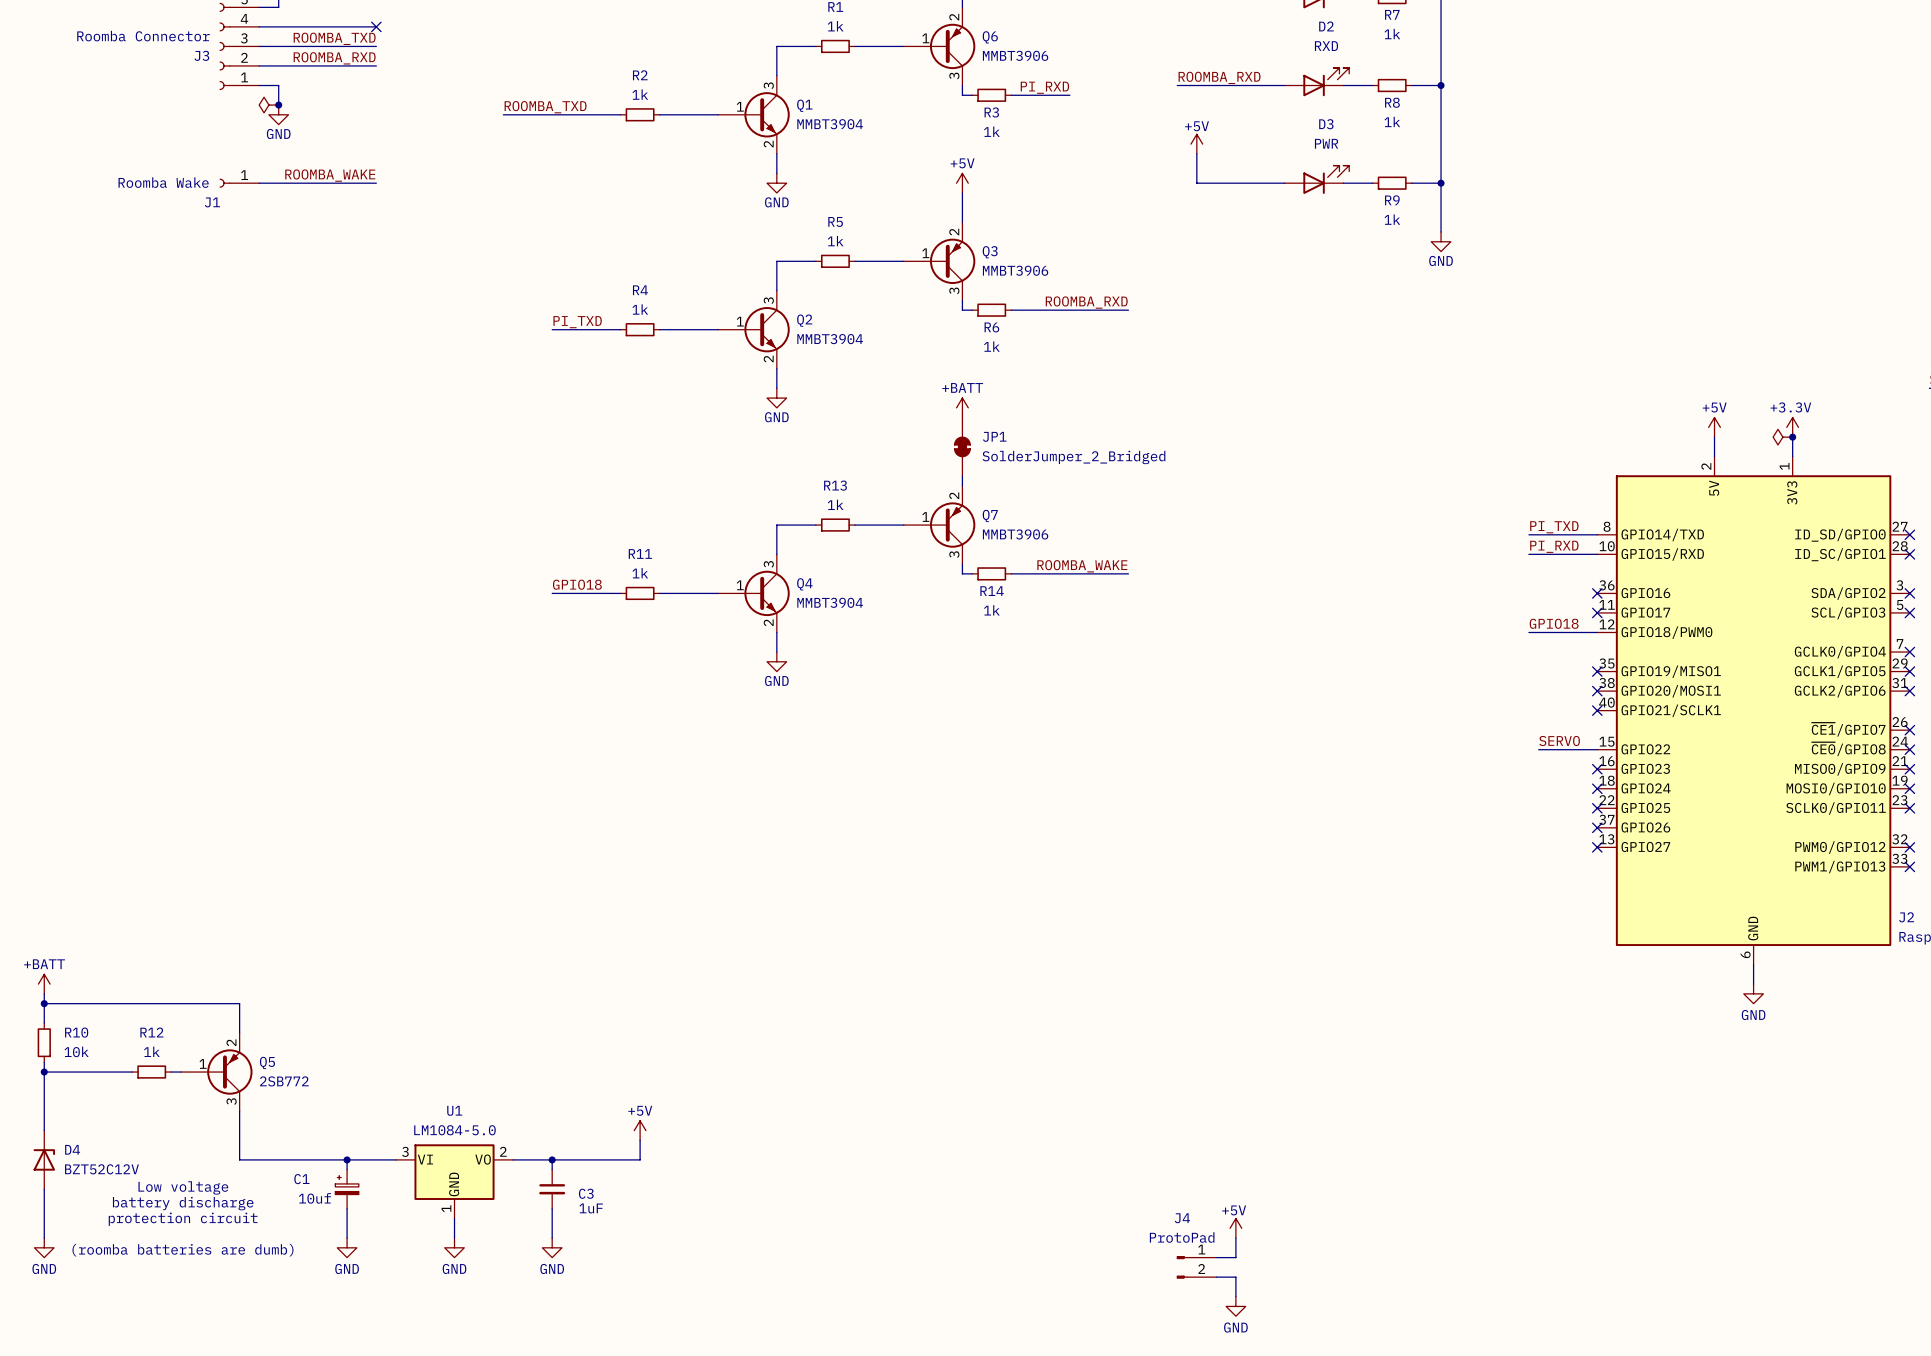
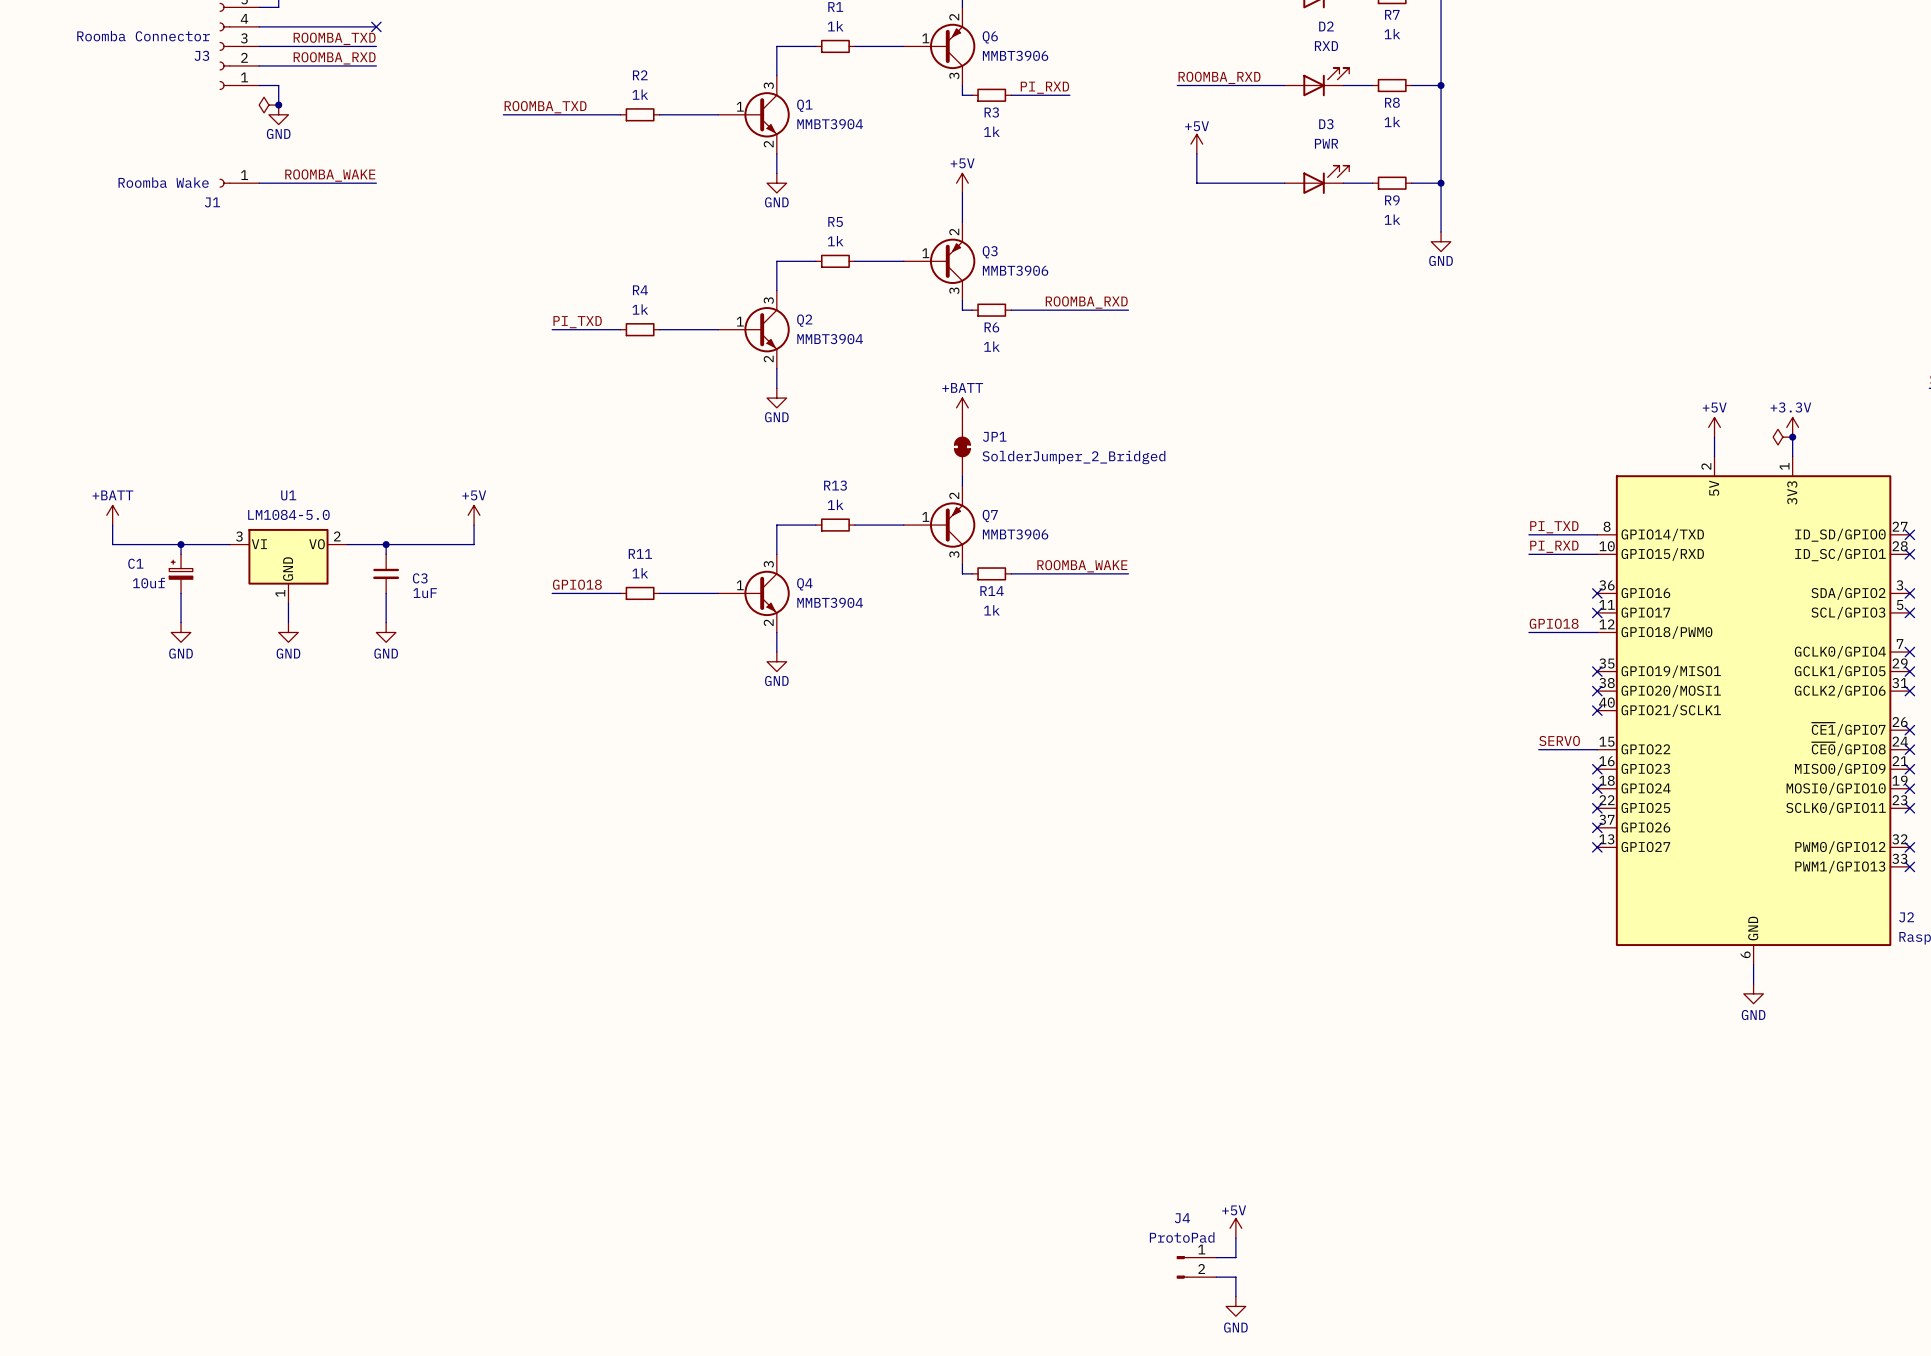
power symbol: none -> +BATT (112, 515)
power symbol: none -> +5V (474, 515)
wire: none -> (112, 525) (112, 544) (229, 544)
wire: none -> (474, 525) (474, 544) (347, 544)
wire: none -> (181, 544) (181, 554)
junction: none -> (181, 544)
wire: none -> (386, 544) (386, 554)
junction: none -> (386, 544)
wire: none -> (181, 593) (181, 622)
wire: none -> (386, 593) (386, 622)
wire: none -> (288, 603) (288, 622)
power symbol: none -> GND (181, 632)
power symbol: none -> GND (288, 632)
power symbol: none -> GND (386, 632)
power symbol: +BATT (44, 984) -> none
wire: (44, 993) (44, 1023) -> none
wire: (44, 1003) (239, 1003) (239, 1032) -> none
junction: (44, 1003) -> none
R10: 10k (44, 1042) -> none
wire: (44, 1062) (44, 1130) -> none
wire: (44, 1072) (132, 1072) -> none
junction: (44, 1072) -> none
R12: 1k (151, 1072) -> none
wire: (171, 1072) (181, 1072) -> none
Q5: 2SB772 (216, 1072) -> none
wire: (239, 1111) (239, 1159) (395, 1159) -> none
power symbol: +5V (640, 1130) -> none
wire: (640, 1140) (640, 1159) (513, 1159) -> none
D4: BZT52C12V (44, 1159) -> none
wire: (347, 1159) (347, 1169) -> none
junction: (347, 1159) -> none
wire: (552, 1159) (552, 1169) -> none
junction: (552, 1159) -> none
U1 position: (454, 1181) -> (288, 566)
text: Low voltage (183, 1187) -> none
wire: (44, 1189) (44, 1238) -> none
C1 position: (347, 1189) -> (181, 573)
C3 position: (552, 1189) -> (386, 573)
text: battery discharge (183, 1203) -> none
wire: (347, 1208) (347, 1238) -> none
wire: (552, 1208) (552, 1238) -> none
wire: (454, 1218) (454, 1238) -> none
text: protection circuit (183, 1219) -> none
power symbol: GND (44, 1247) -> none
power symbol: GND (347, 1247) -> none
power symbol: GND (454, 1247) -> none
power symbol: GND (552, 1247) -> none
text: (roomba batteries are dumb) (182, 1250) -> none

